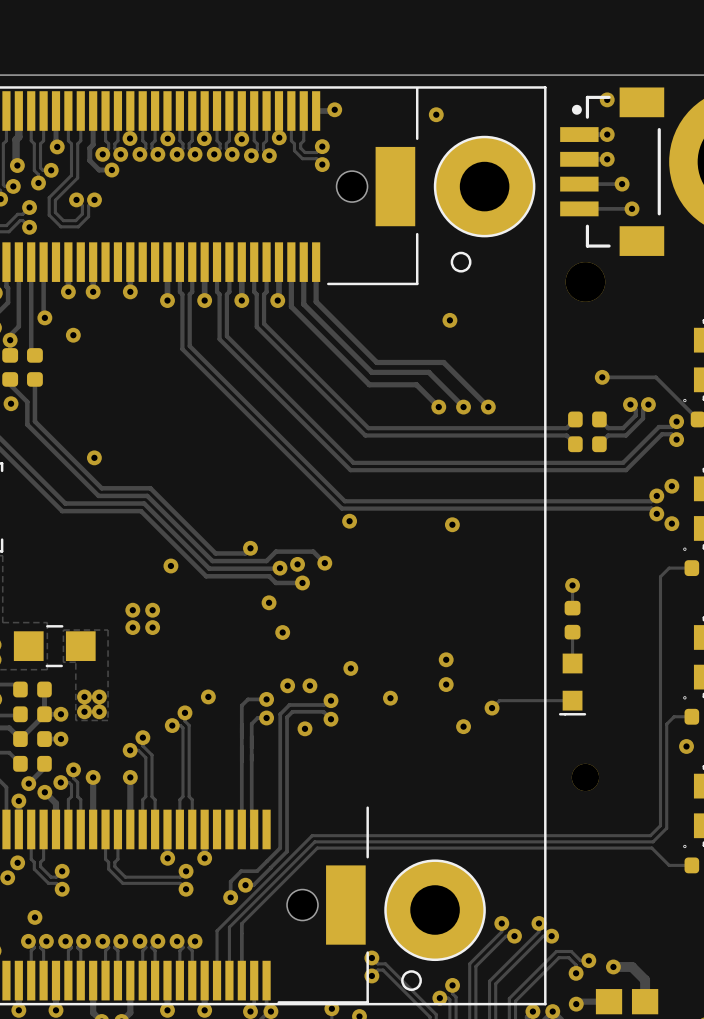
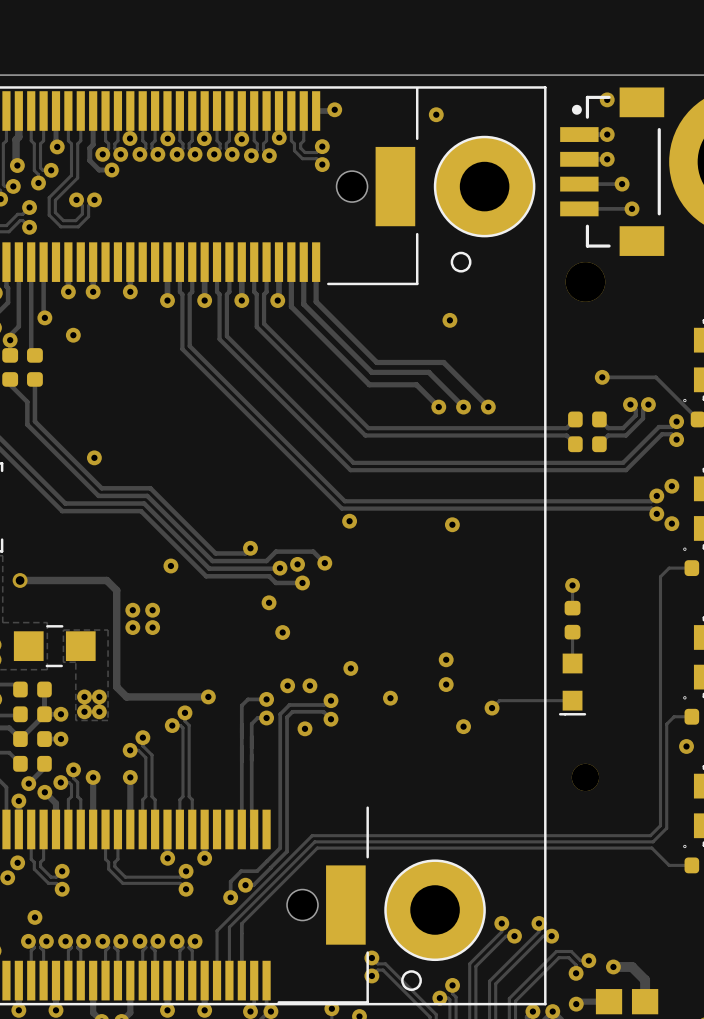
via: (11, 403) -> none
track: none -> (20, 580) (106, 580) (116, 590) (116, 687) (126, 696) (208, 696)
via: none -> (20, 580)

